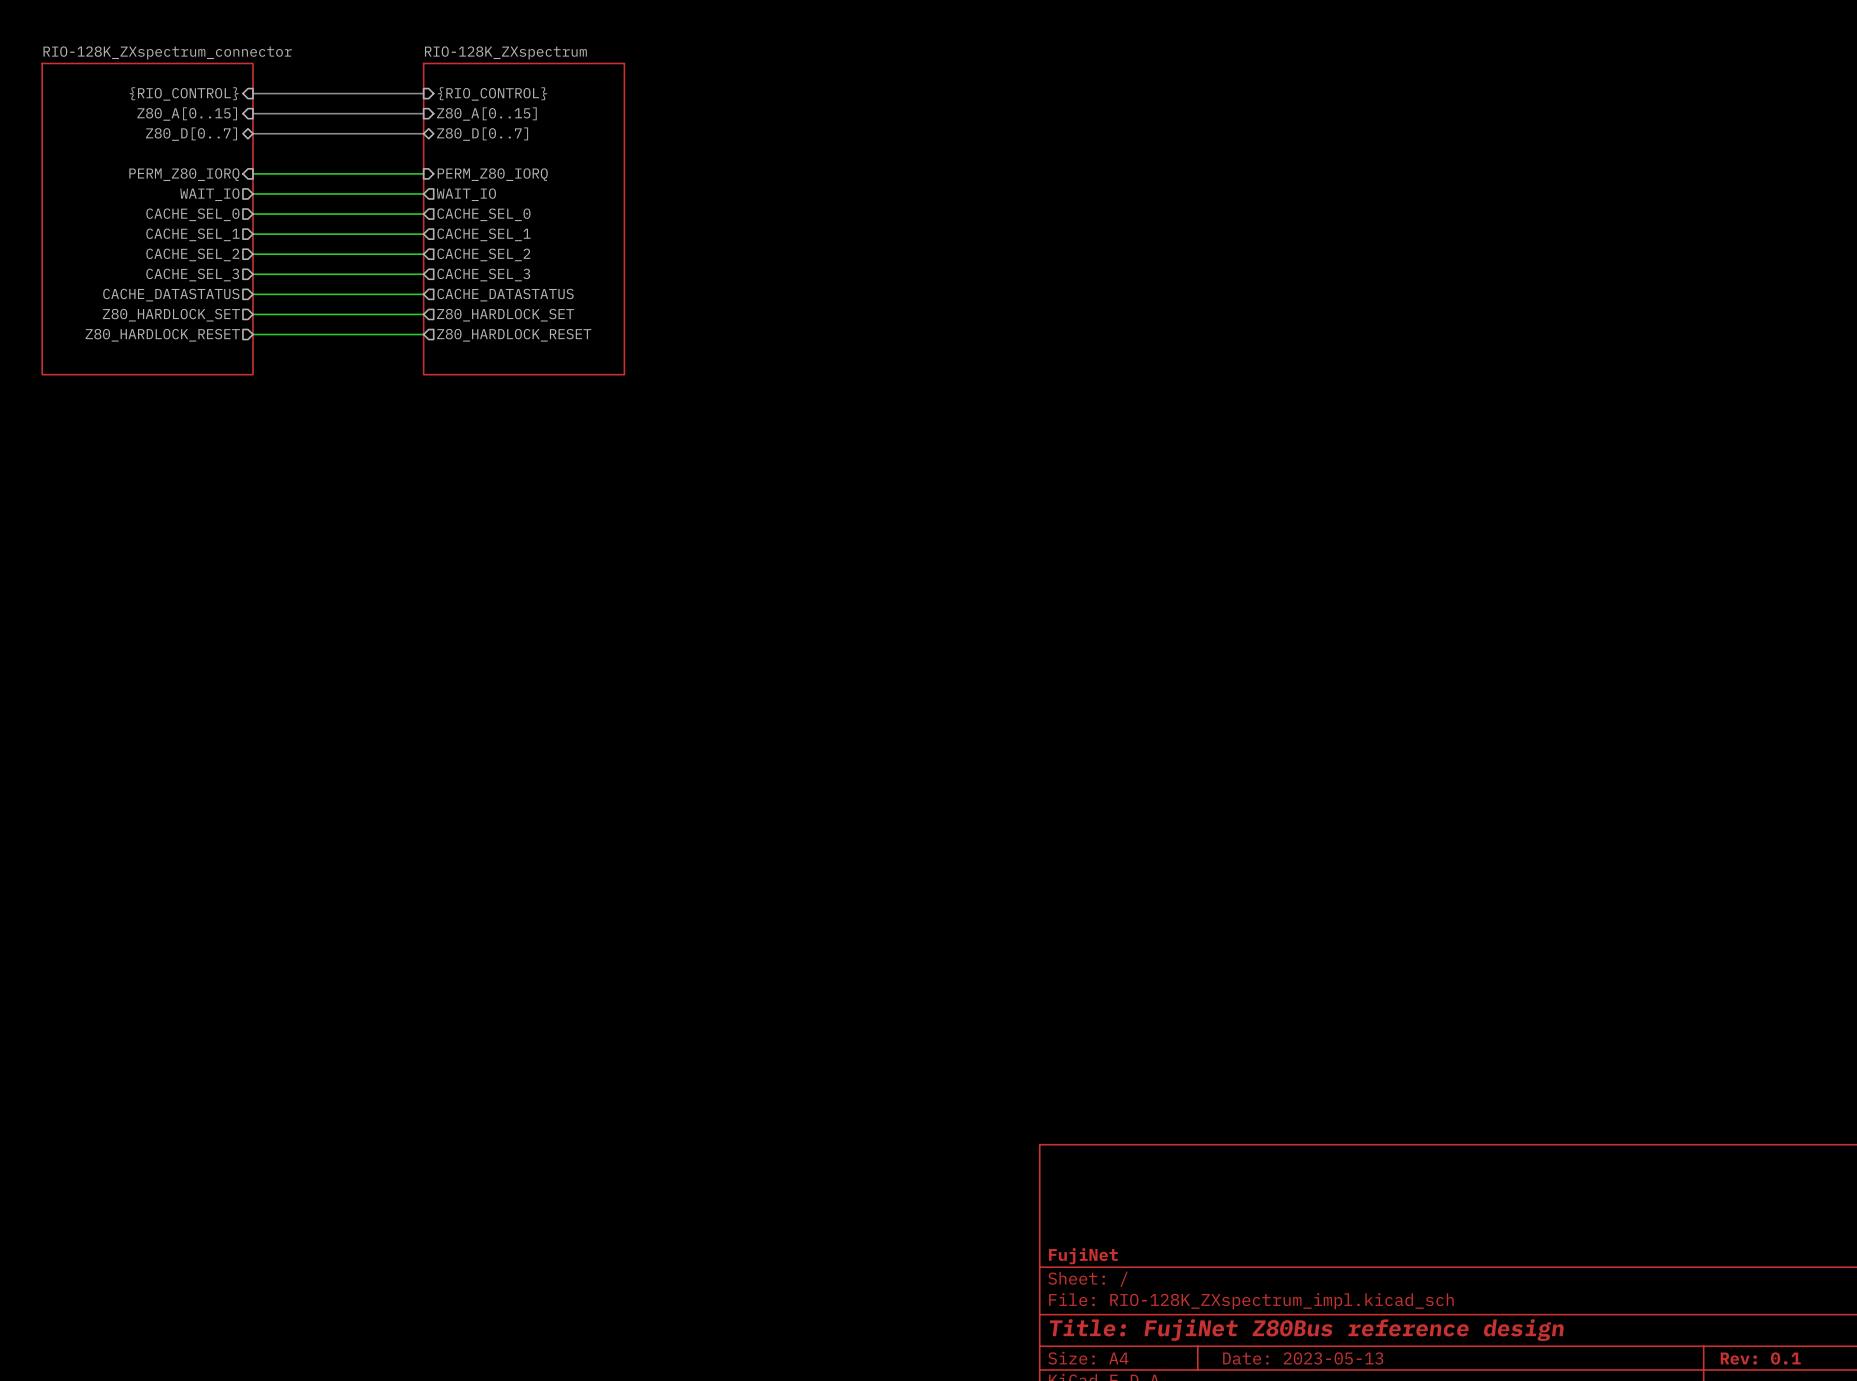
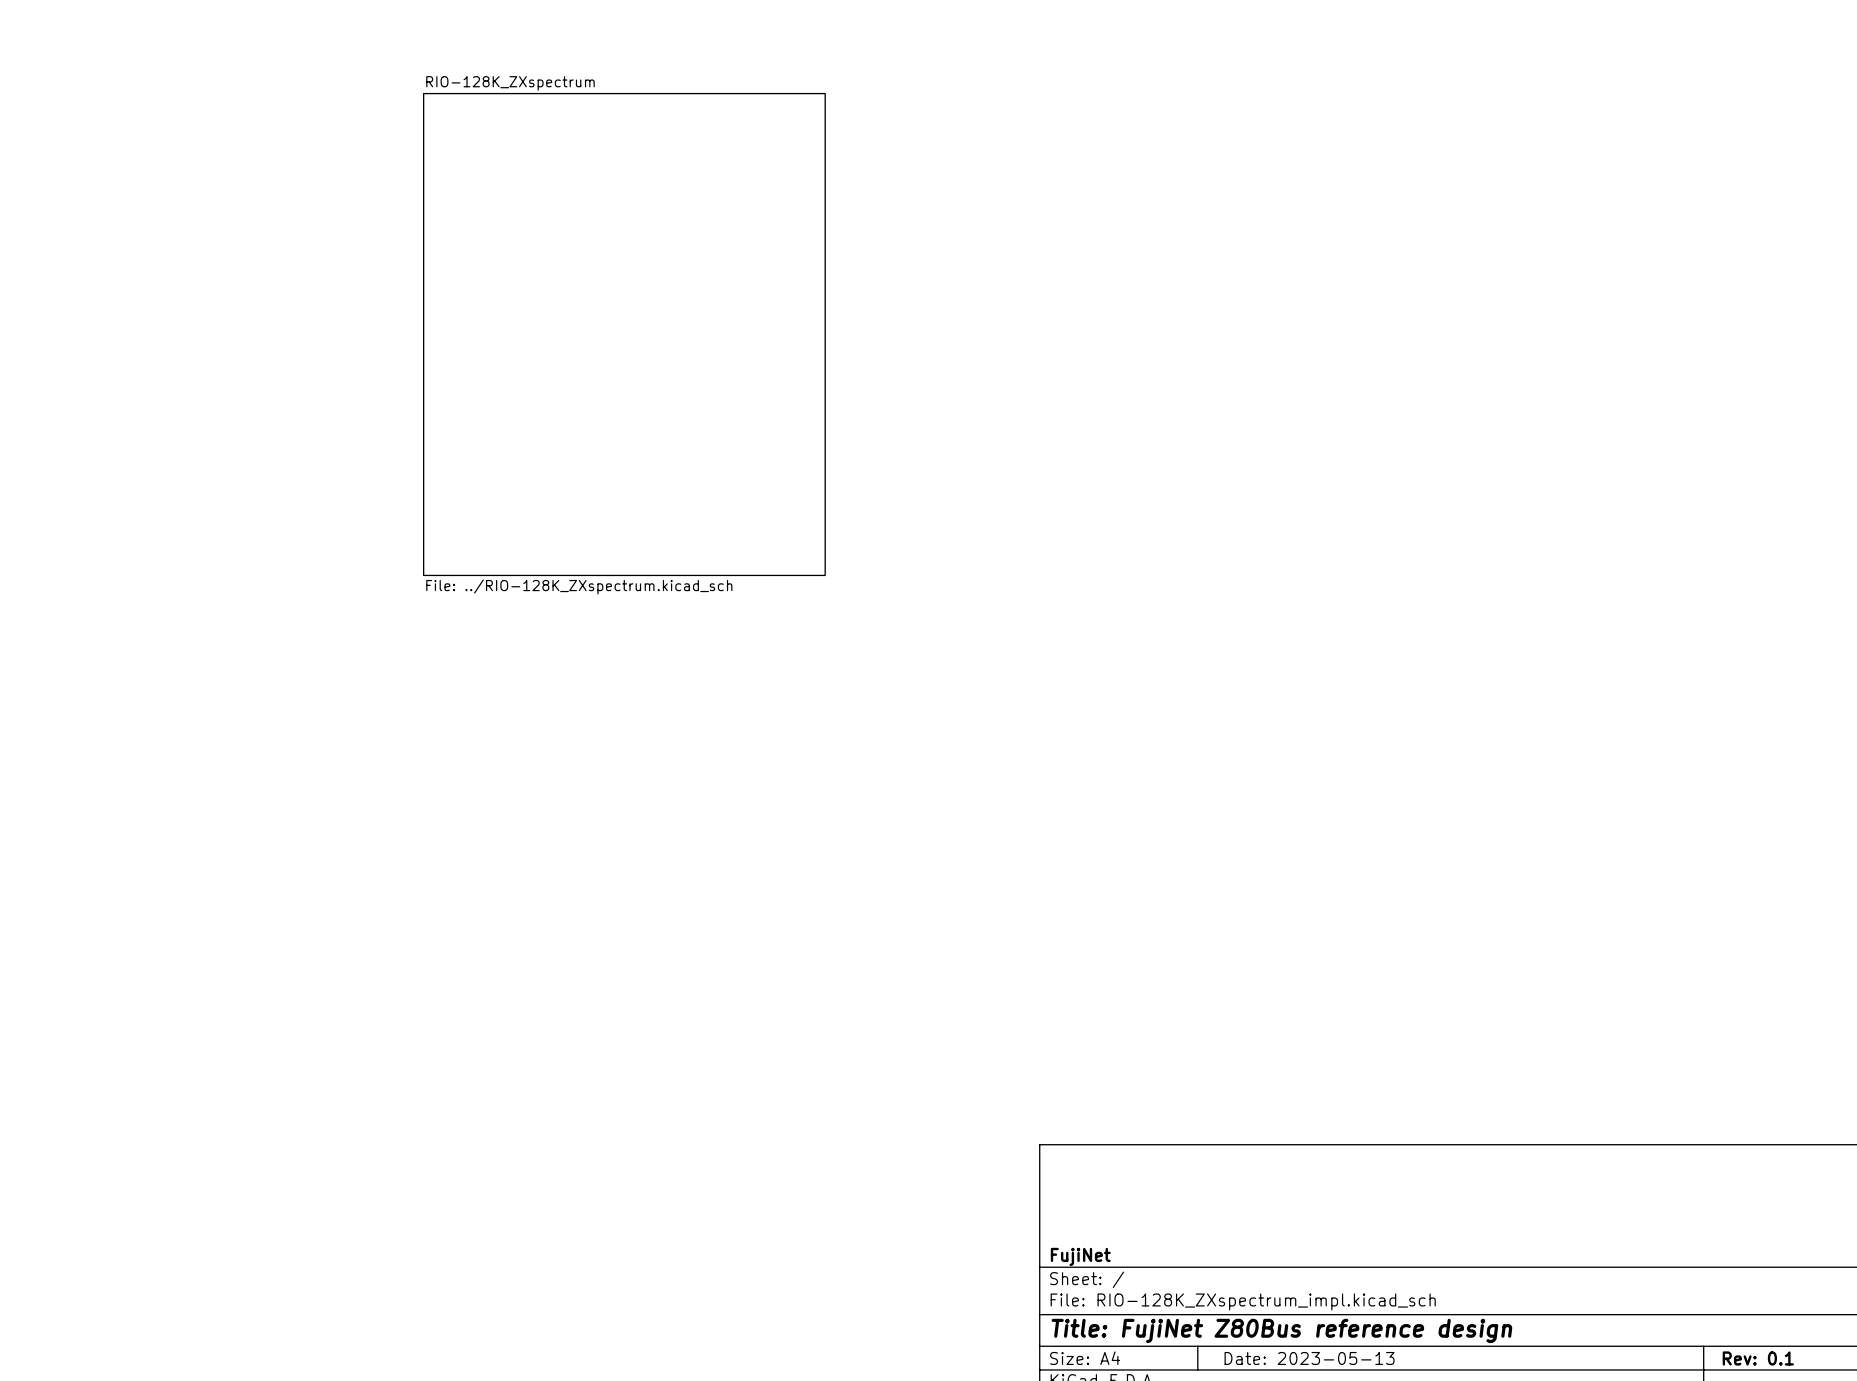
sheet RIO-128K_ZXspectrum name position: RIO-128K_ZXspectrum (505, 52) -> RIO-128K_ZXspectrum (510, 83)
sheet RIO-128K_ZXspectrum shape: [423, 62, 626, 376] -> [423, 92, 826, 577]
sheet pin: {RIO_CONTROL} (184, 93) -> none
bus: (252, 93) (423, 93) -> none
sheet pin: {RIO_CONTROL} (492, 93) -> none
bus: (252, 113) (423, 113) -> none
sheet pin: Z80_A[0..15] (187, 114) -> none
sheet pin: Z80_A[0..15] (486, 114) -> none
bus: (252, 133) (423, 133) -> none
sheet pin: Z80_D[0..7] (191, 134) -> none
sheet pin: Z80_D[0..7] (482, 134) -> none
wire: (252, 173) (423, 173) -> none
sheet pin: PERM_Z80_IORQ (184, 174) -> none
sheet pin: PERM_Z80_IORQ (492, 174) -> none
wire: (252, 193) (423, 193) -> none
sheet pin: WAIT_IO (209, 194) -> none
sheet pin: WAIT_IO (466, 194) -> none
sheet pin: CACHE_SEL_0 (192, 214) -> none
wire: (252, 214) (423, 214) -> none
sheet pin: CACHE_SEL_0 (483, 214) -> none
sheet RIO-128K_ZXspectrum_connector: (147, 219) -> none
sheet pin: CACHE_SEL_1 (192, 234) -> none
wire: (252, 234) (423, 234) -> none
sheet pin: CACHE_SEL_1 (484, 234) -> none
sheet pin: CACHE_SEL_2 (192, 254) -> none
wire: (252, 254) (423, 254) -> none
sheet pin: CACHE_SEL_2 (483, 254) -> none
wire: (252, 274) (423, 274) -> none
sheet pin: CACHE_SEL_3 (192, 275) -> none
sheet pin: CACHE_SEL_3 (483, 275) -> none
wire: (252, 294) (423, 294) -> none
sheet pin: CACHE_DATASTATUS (171, 295) -> none
sheet pin: CACHE_DATASTATUS (505, 295) -> none
wire: (252, 314) (423, 314) -> none
sheet pin: Z80_HARDLOCK_SET (171, 315) -> none
sheet pin: Z80_HARDLOCK_SET (505, 315) -> none
wire: (252, 334) (423, 334) -> none
sheet pin: Z80_HARDLOCK_RESET (162, 335) -> none
sheet pin: Z80_HARDLOCK_RESET (514, 335) -> none
sheet RIO-128K_ZXspectrum value: none -> File: ../RIO-128K_ZXspectrum.kicad_sch (579, 586)

